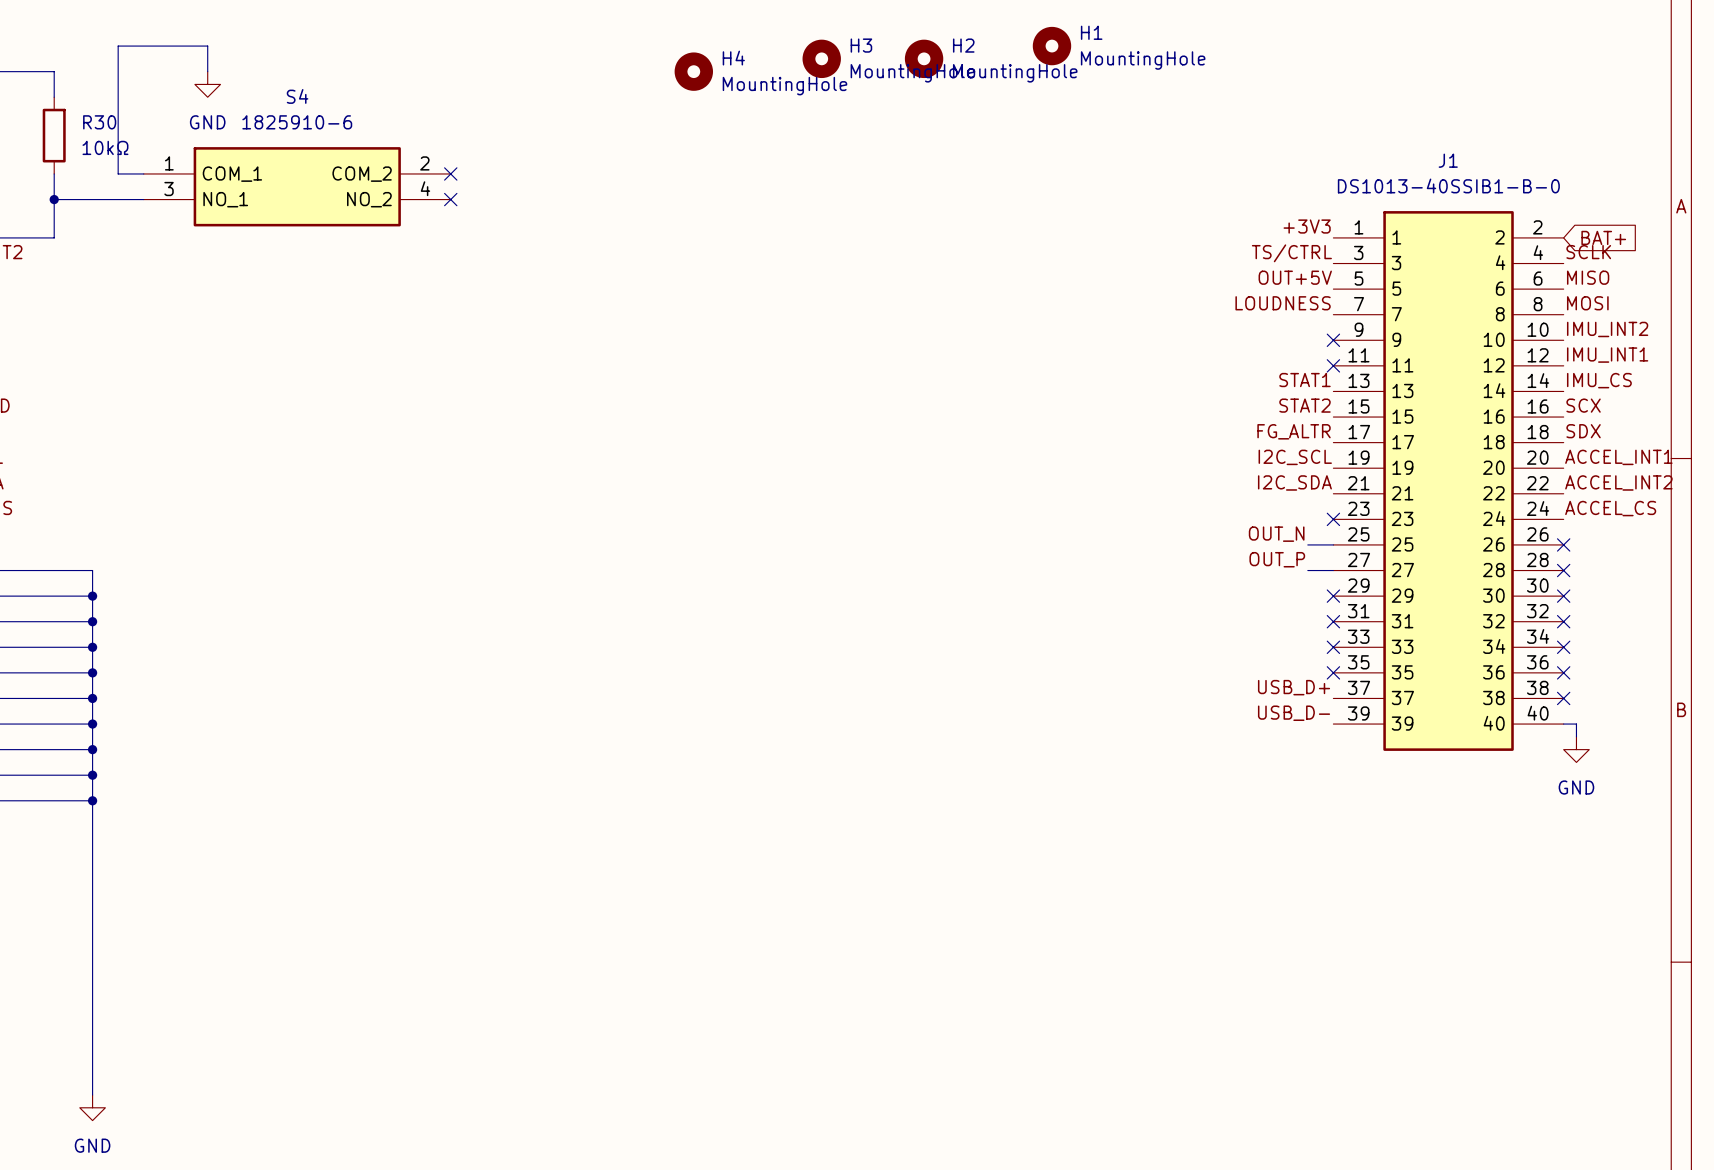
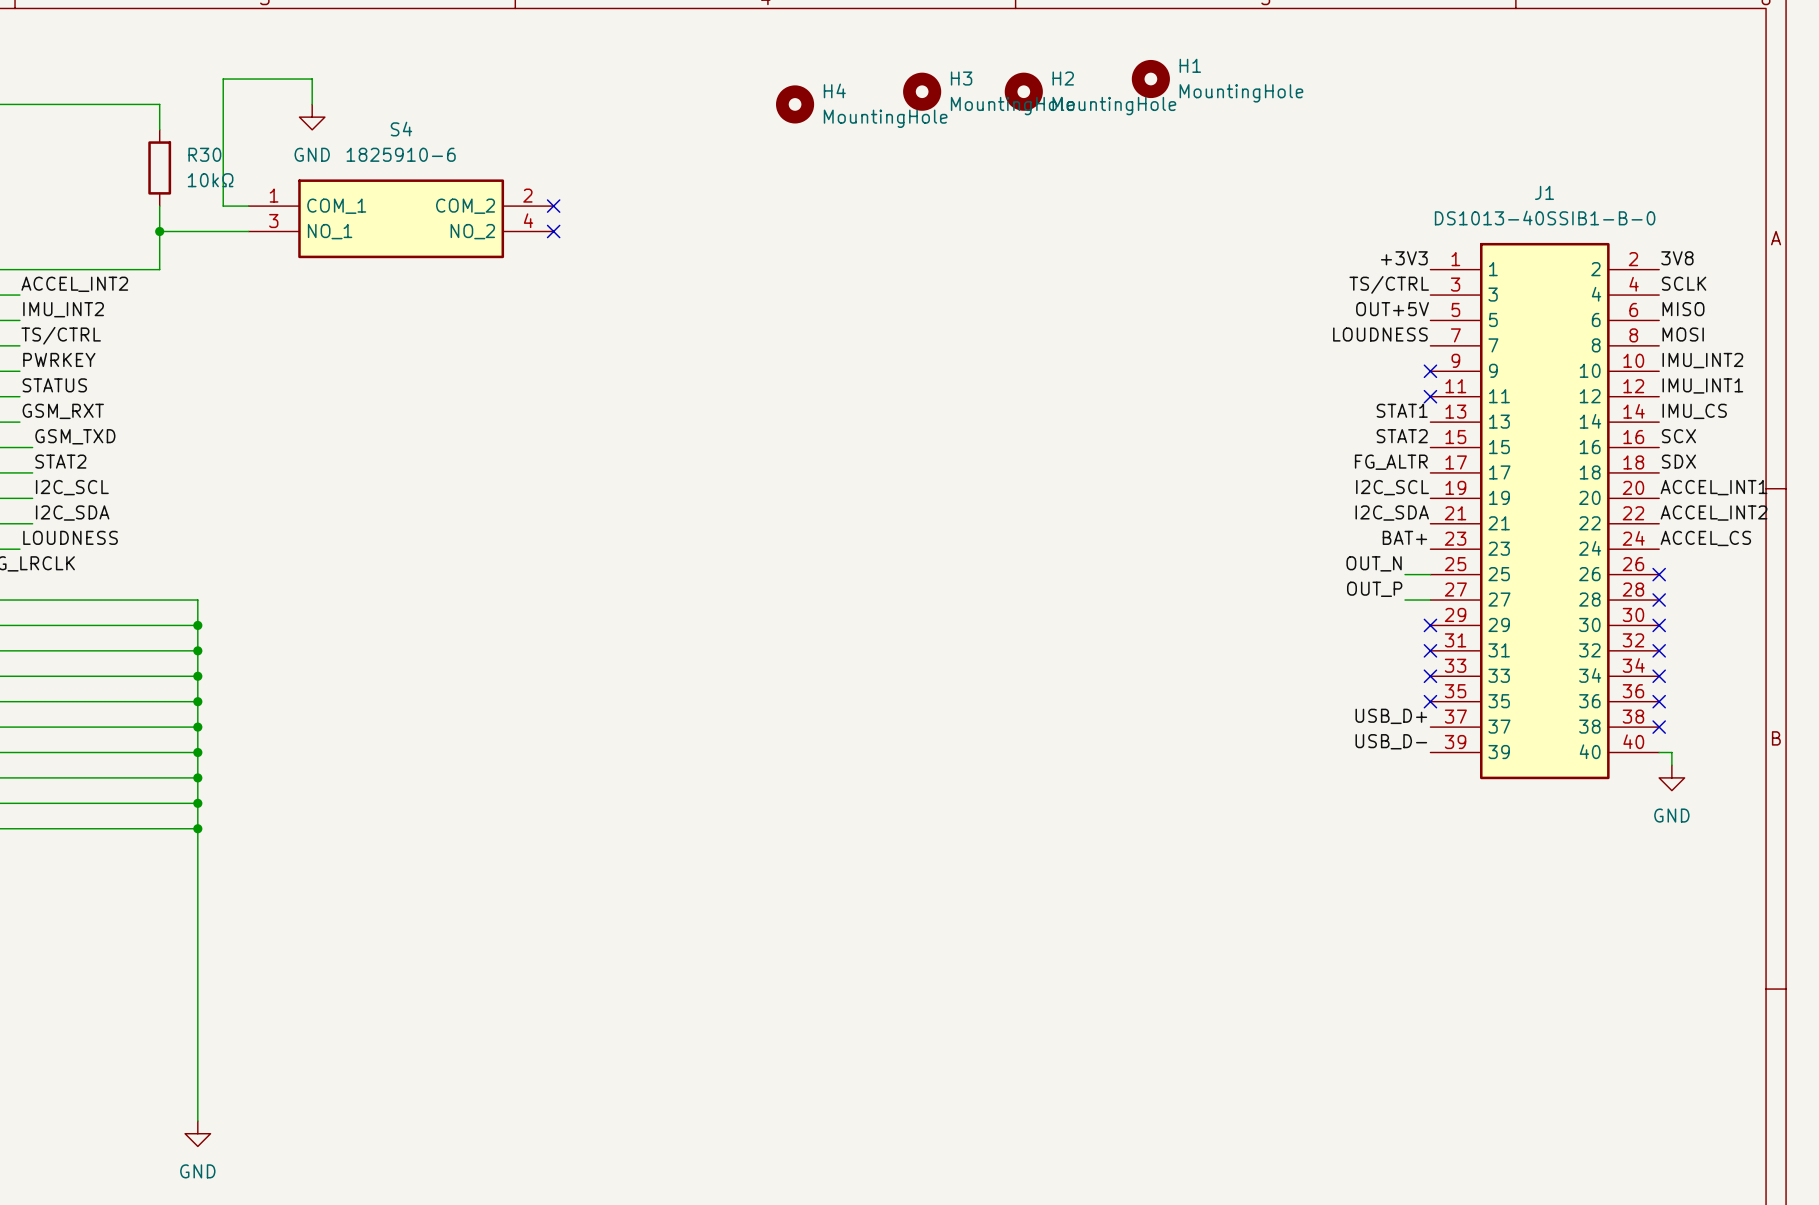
label: none -> 3V8 (1677, 258)
global label: BAT+ (1603, 237) -> none
label: none -> BAT+ (1404, 537)
no-connect mark: (1333, 519) -> none

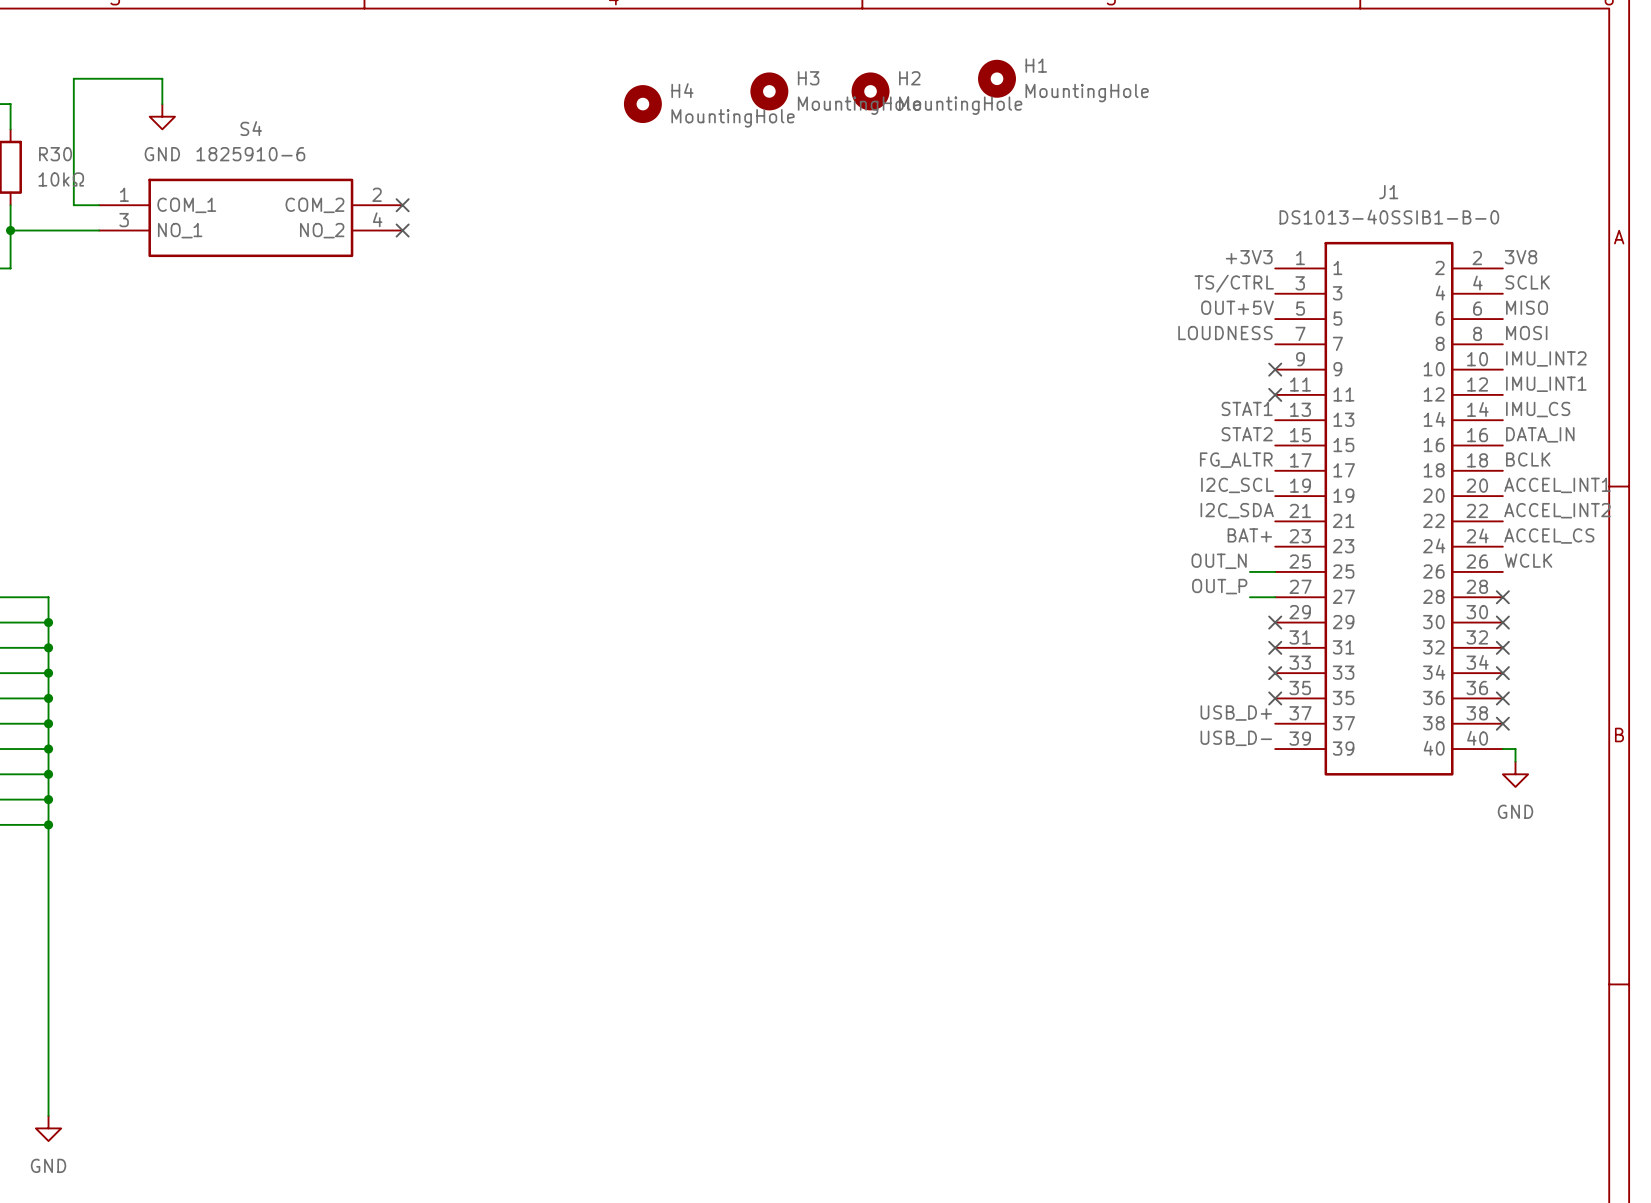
label: SCX (1678, 436) -> DATA_IN (1540, 434)
label: SDX (1678, 461) -> BCLK (1528, 459)
label: none -> WCLK (1528, 560)
no-connect mark: (1659, 574) -> none

